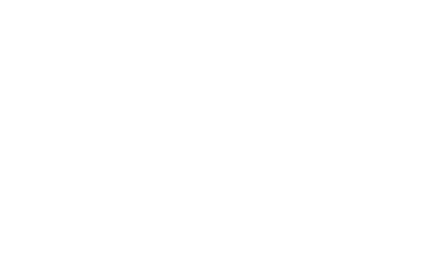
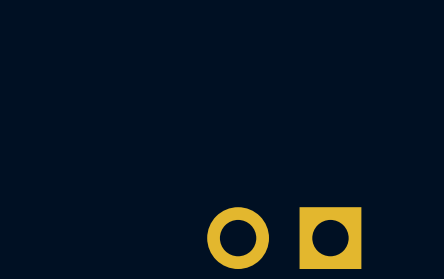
part: none -> (284, 238)

